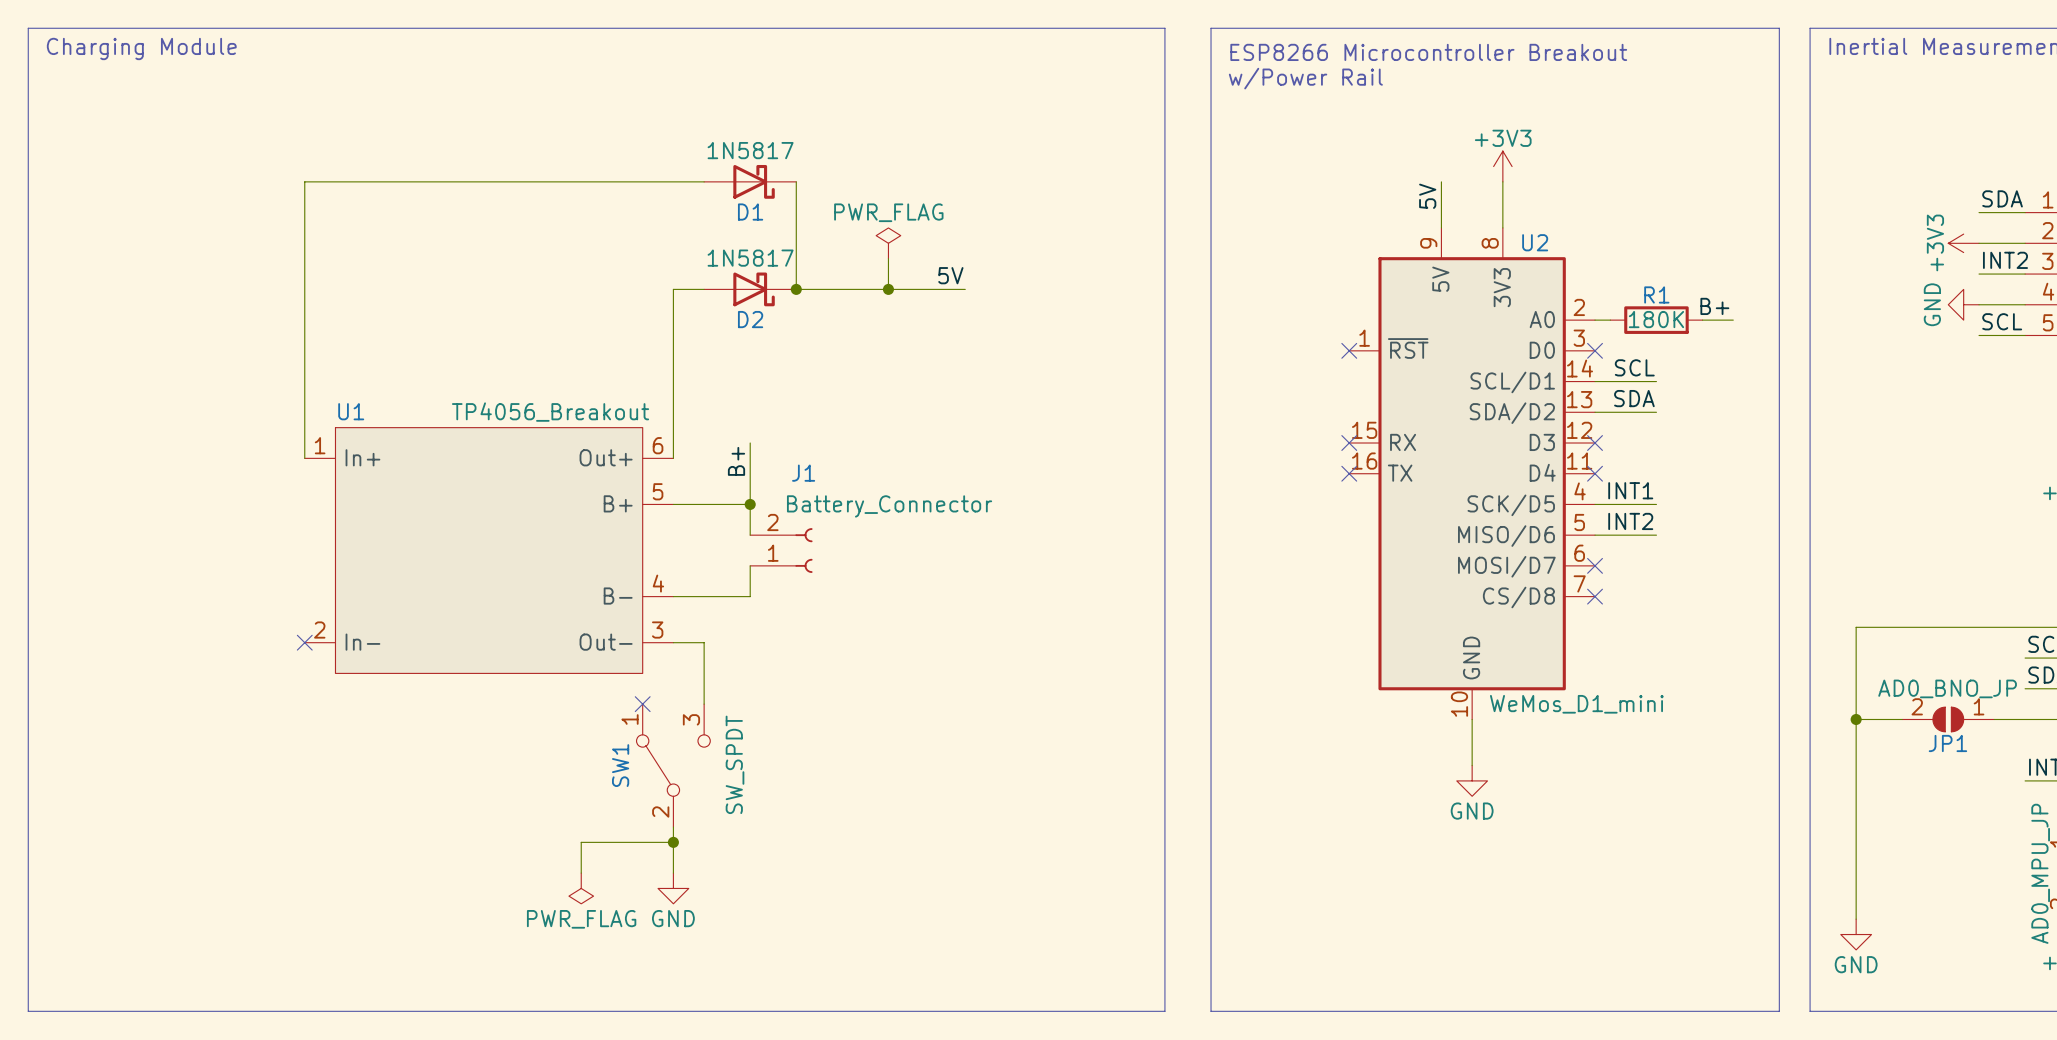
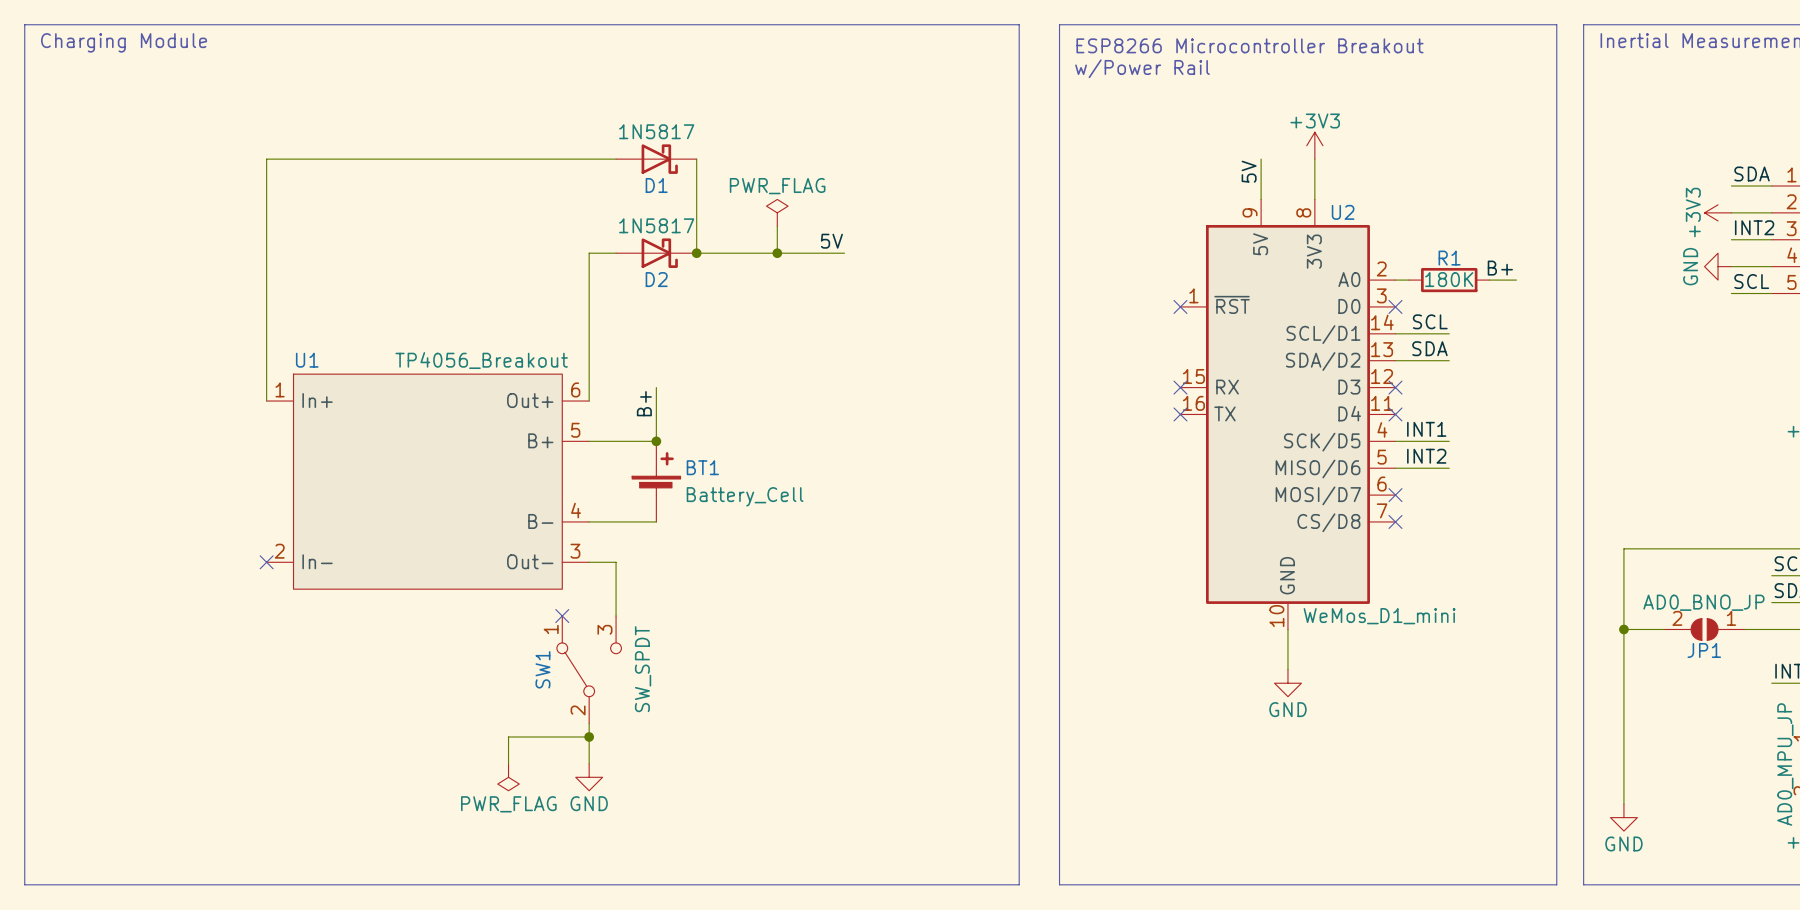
BT1: none -> Battery_Cell (656, 481)
J1: Battery_Connector (781, 550) -> none

